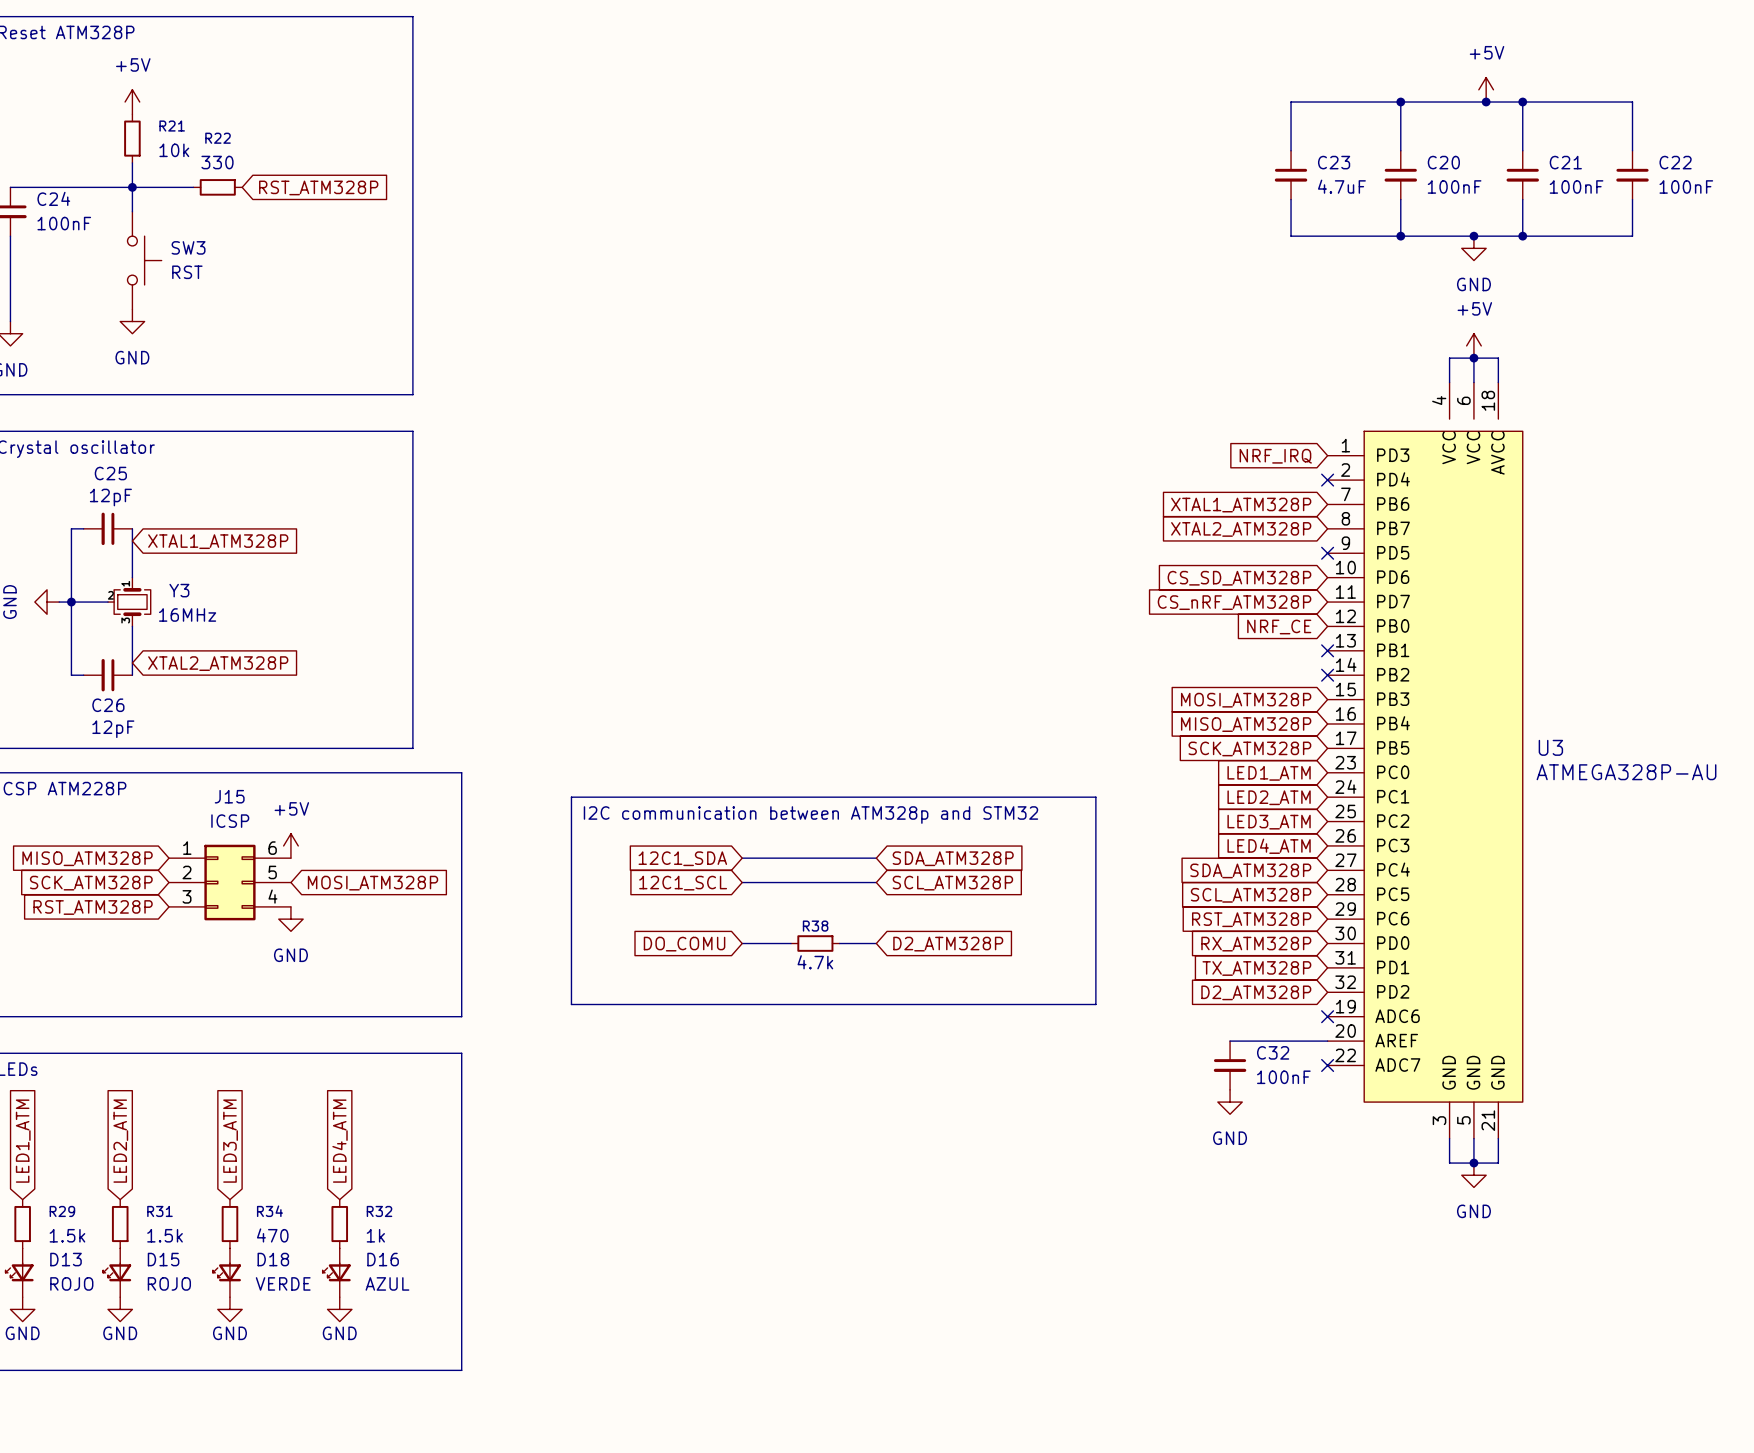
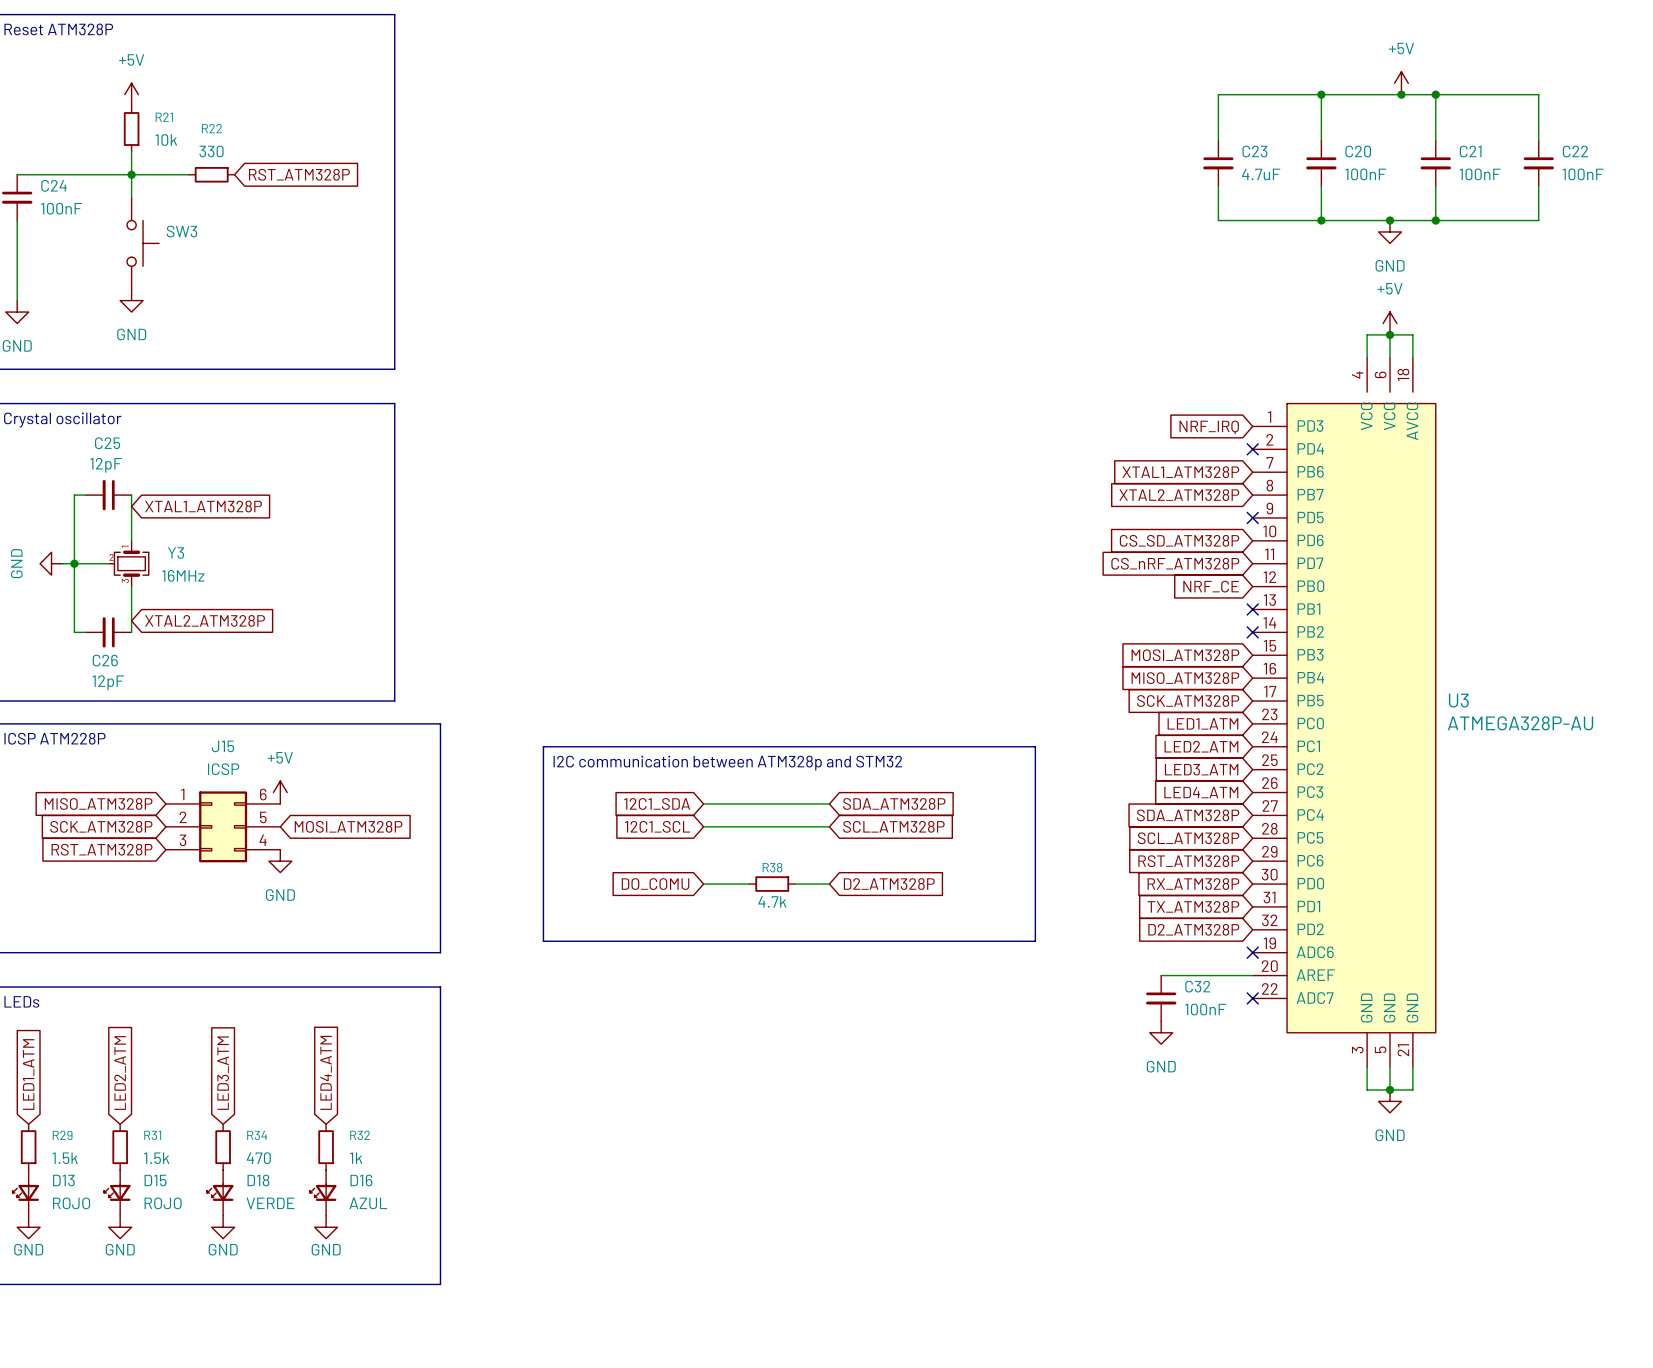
SW3 value: RST (187, 272) -> none

